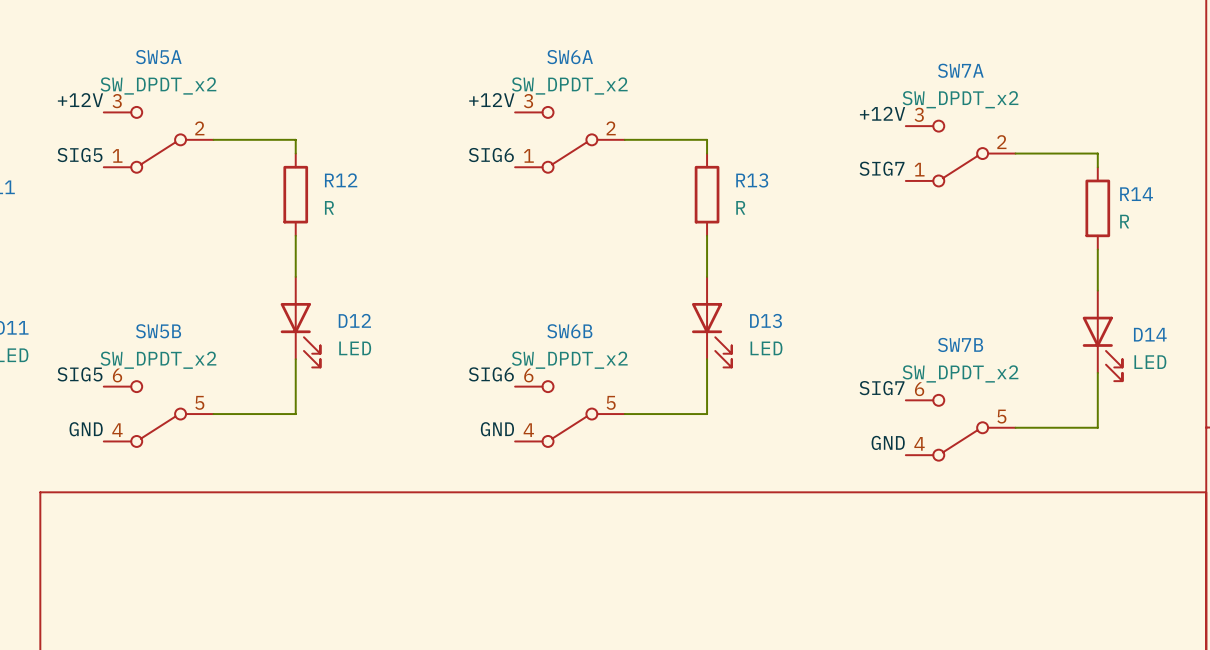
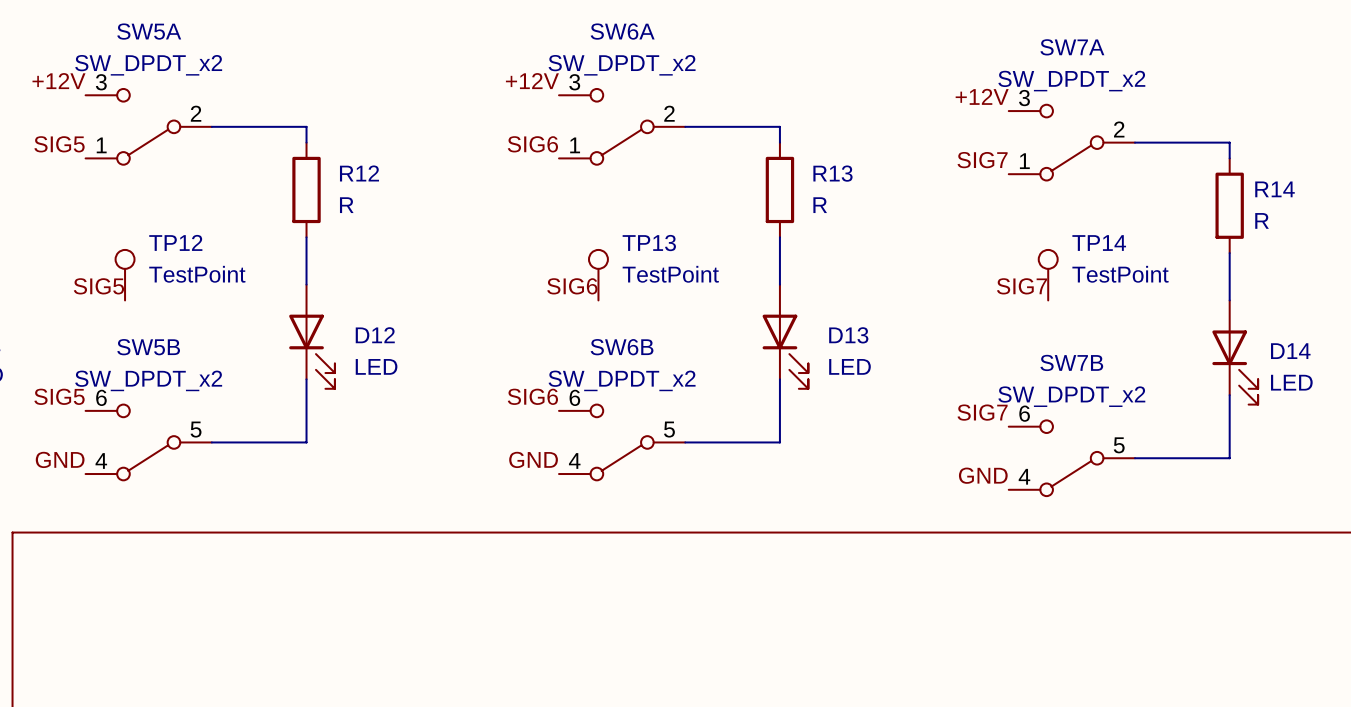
TP12: none -> TestPoint (125, 275)
TP13: none -> TestPoint (598, 275)
TP14: none -> TestPoint (1048, 275)
label: none -> SIG5 (98, 286)
label: none -> SIG6 (572, 286)
label: none -> SIG7 (1022, 286)

